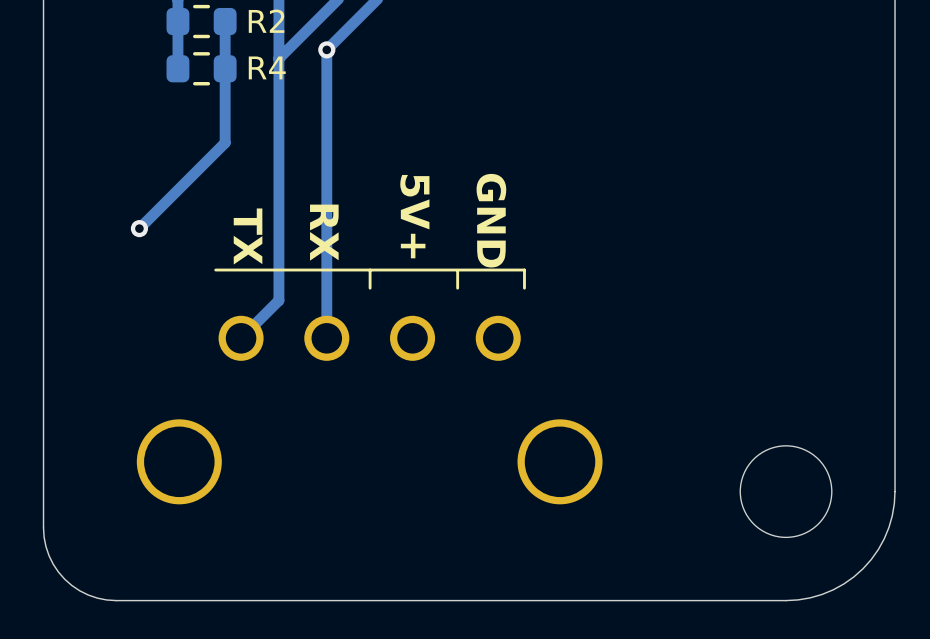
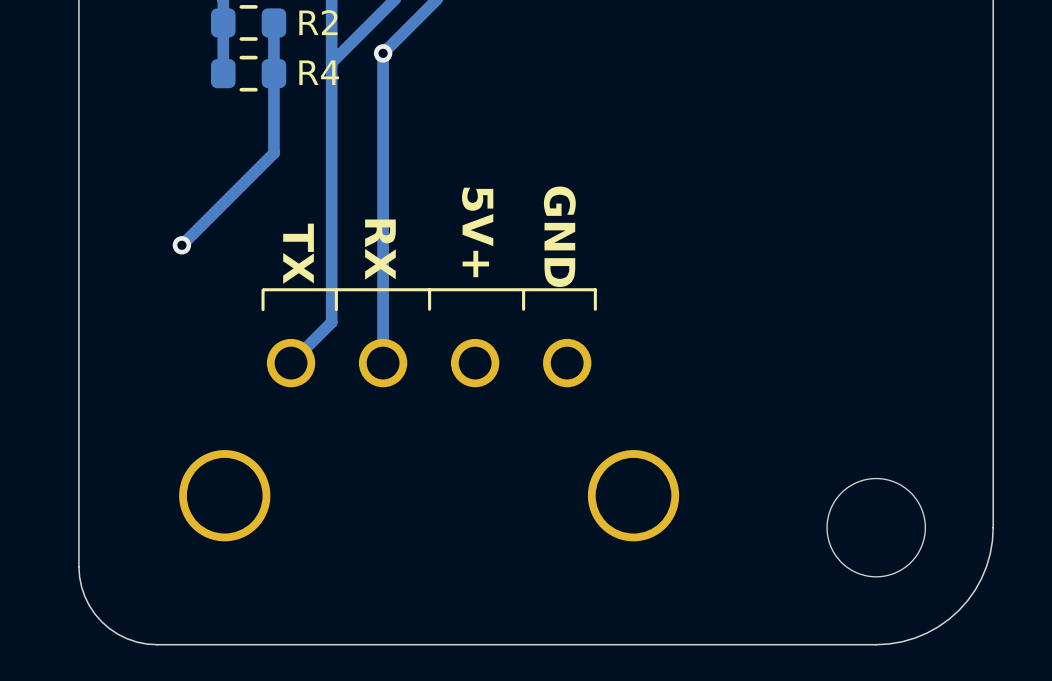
line: none -> (263, 290) (263, 309)
line: none -> (336, 290) (336, 309)

